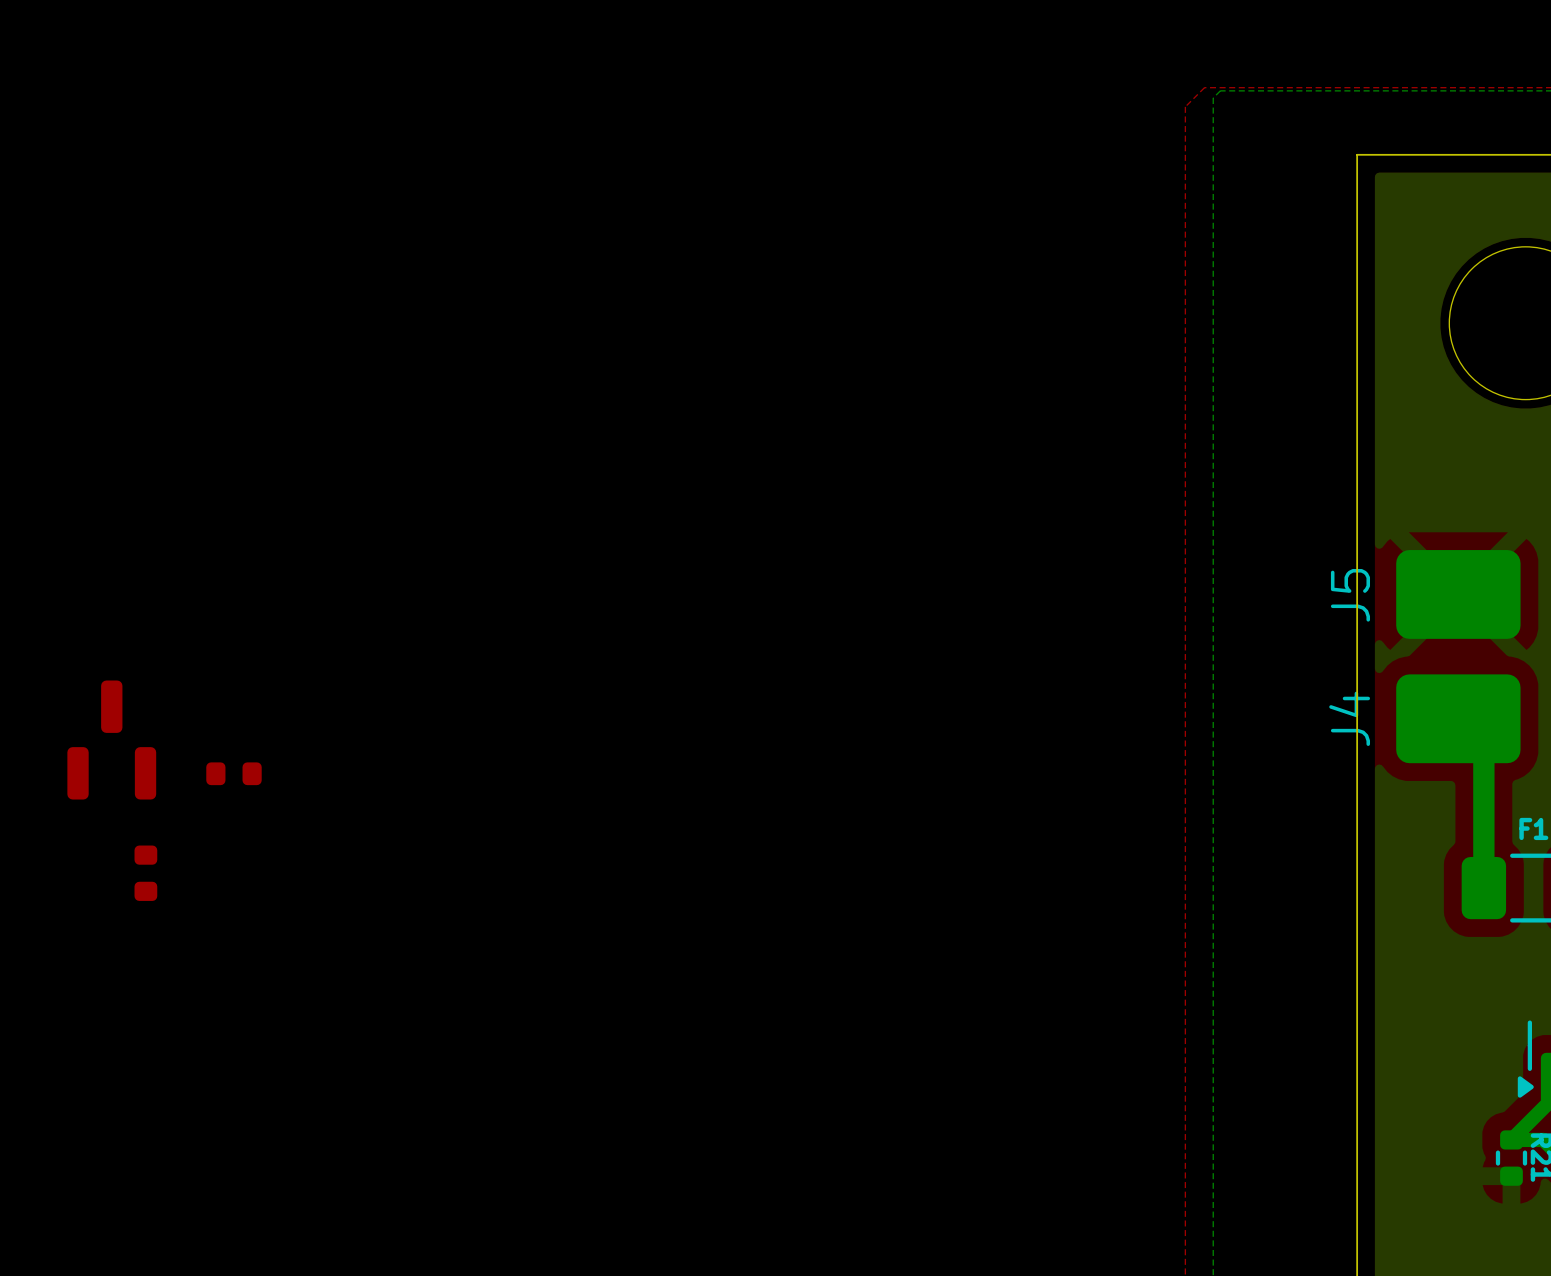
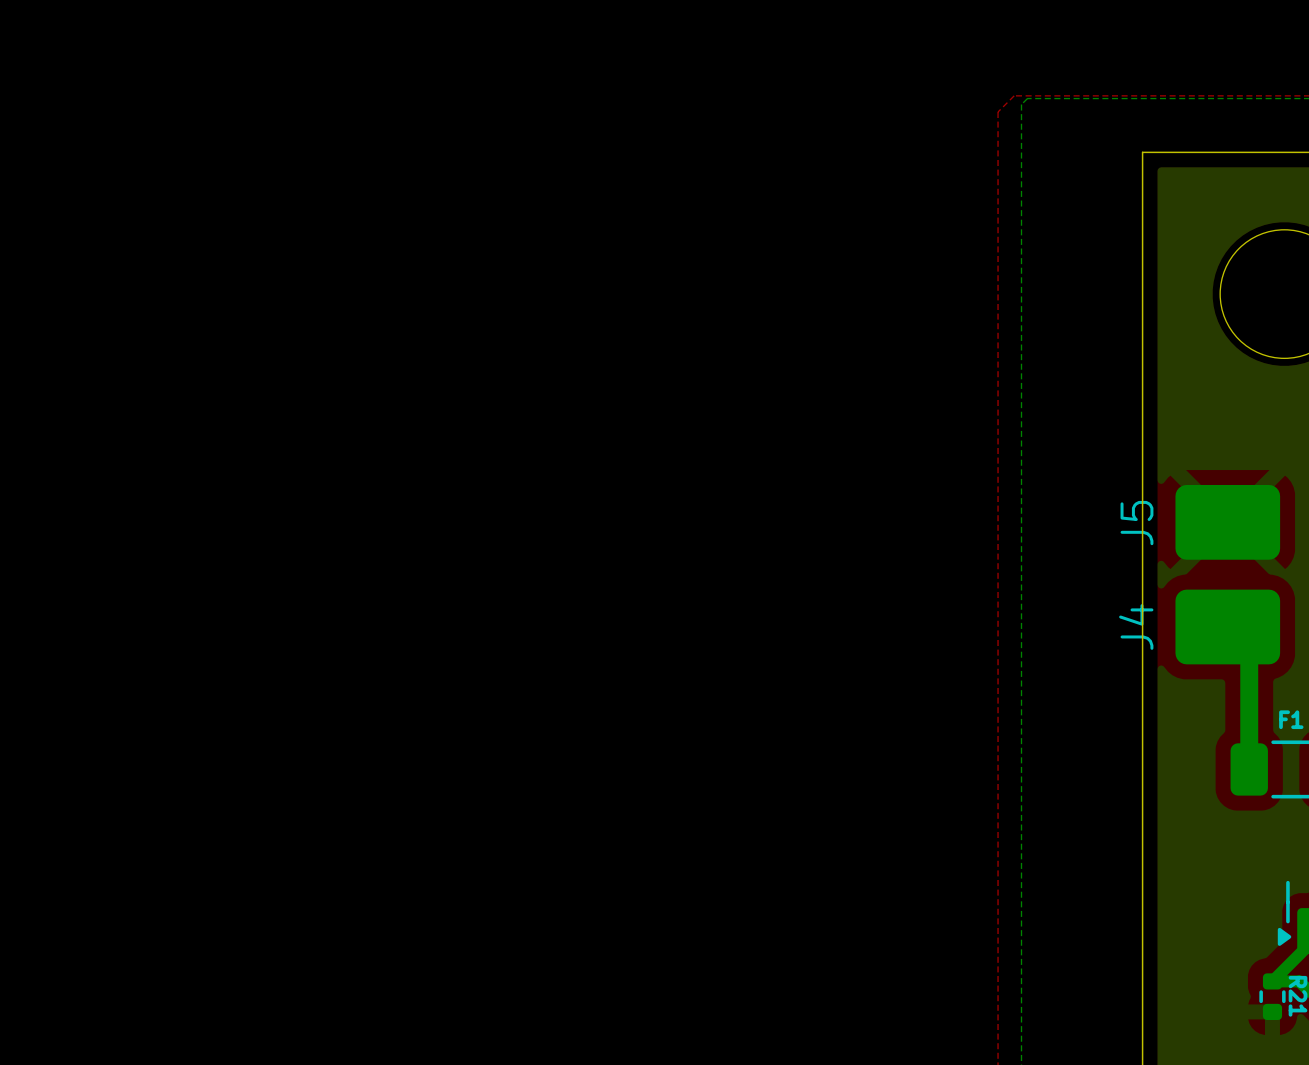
part: (111, 740) -> none
part: (233, 773) -> none
part: (145, 873) -> none

